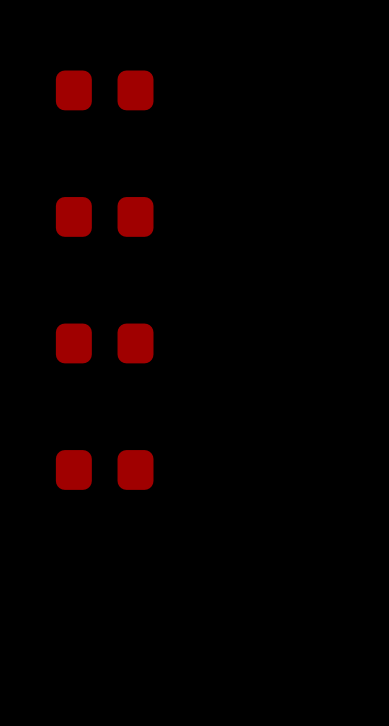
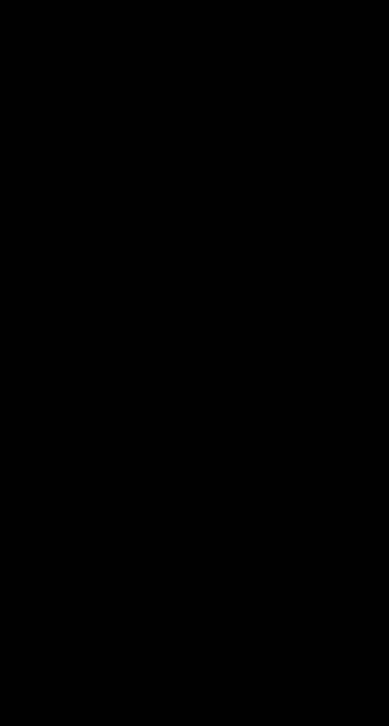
part: (104, 90) -> none
part: (104, 216) -> none
part: (104, 343) -> none
part: (104, 469) -> none

